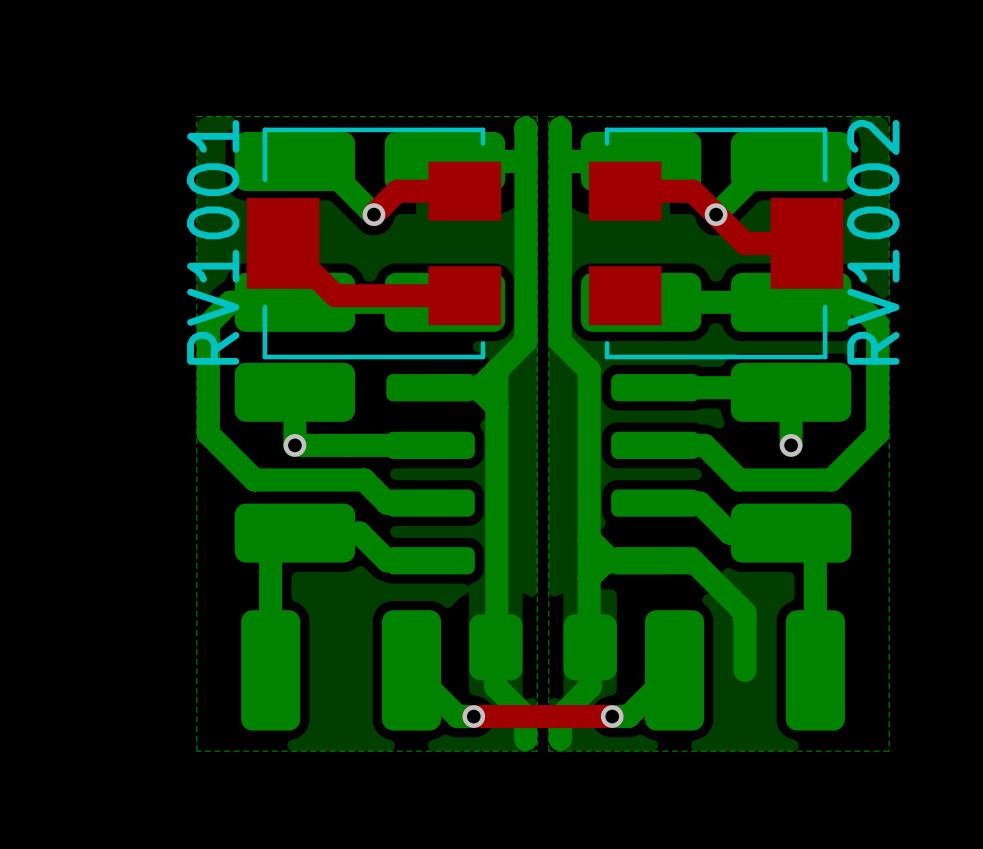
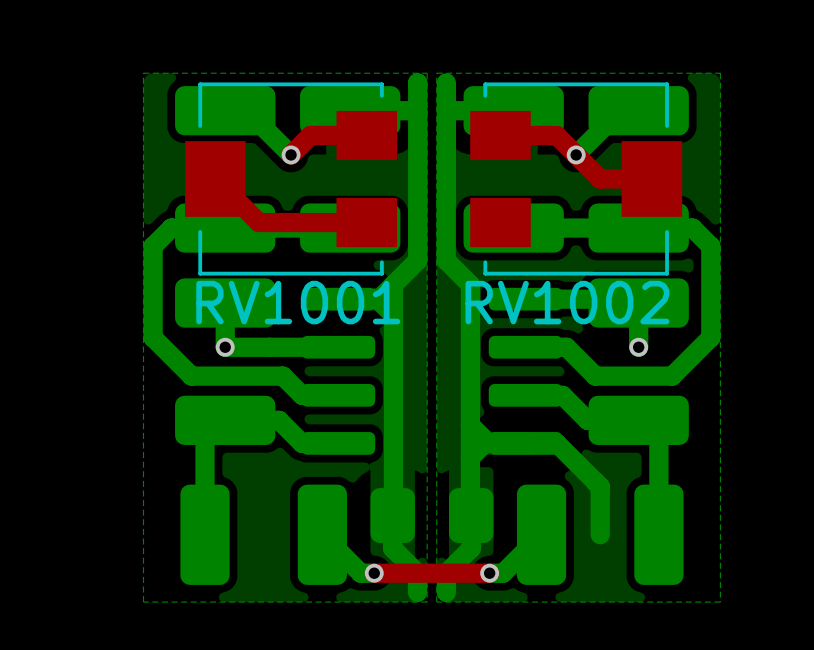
RV1001 name rotation: 0° (213, 242) -> 90° clockwise (298, 302)
RV1002 name rotation: 0° (873, 242) -> 90° clockwise (567, 302)

